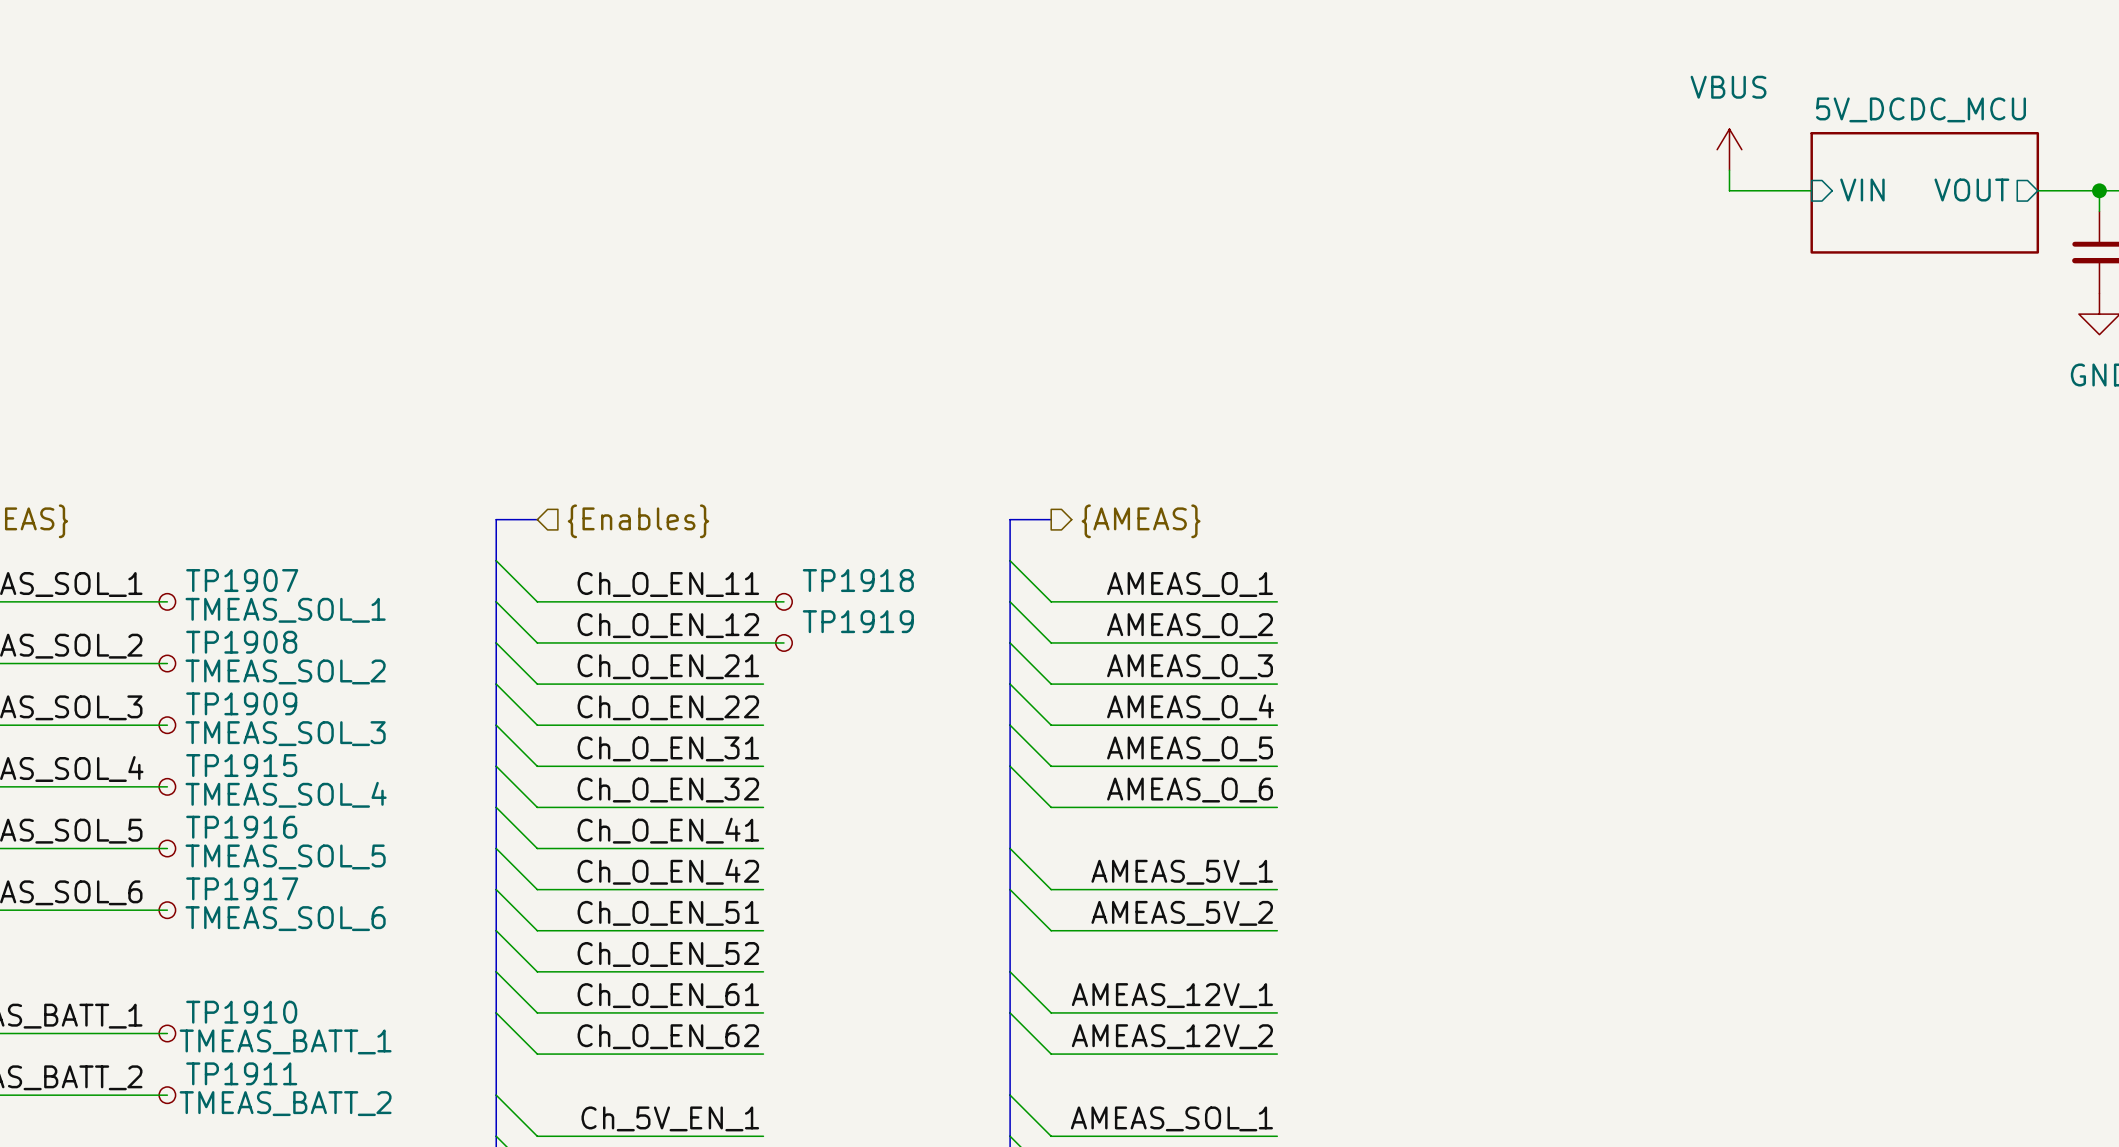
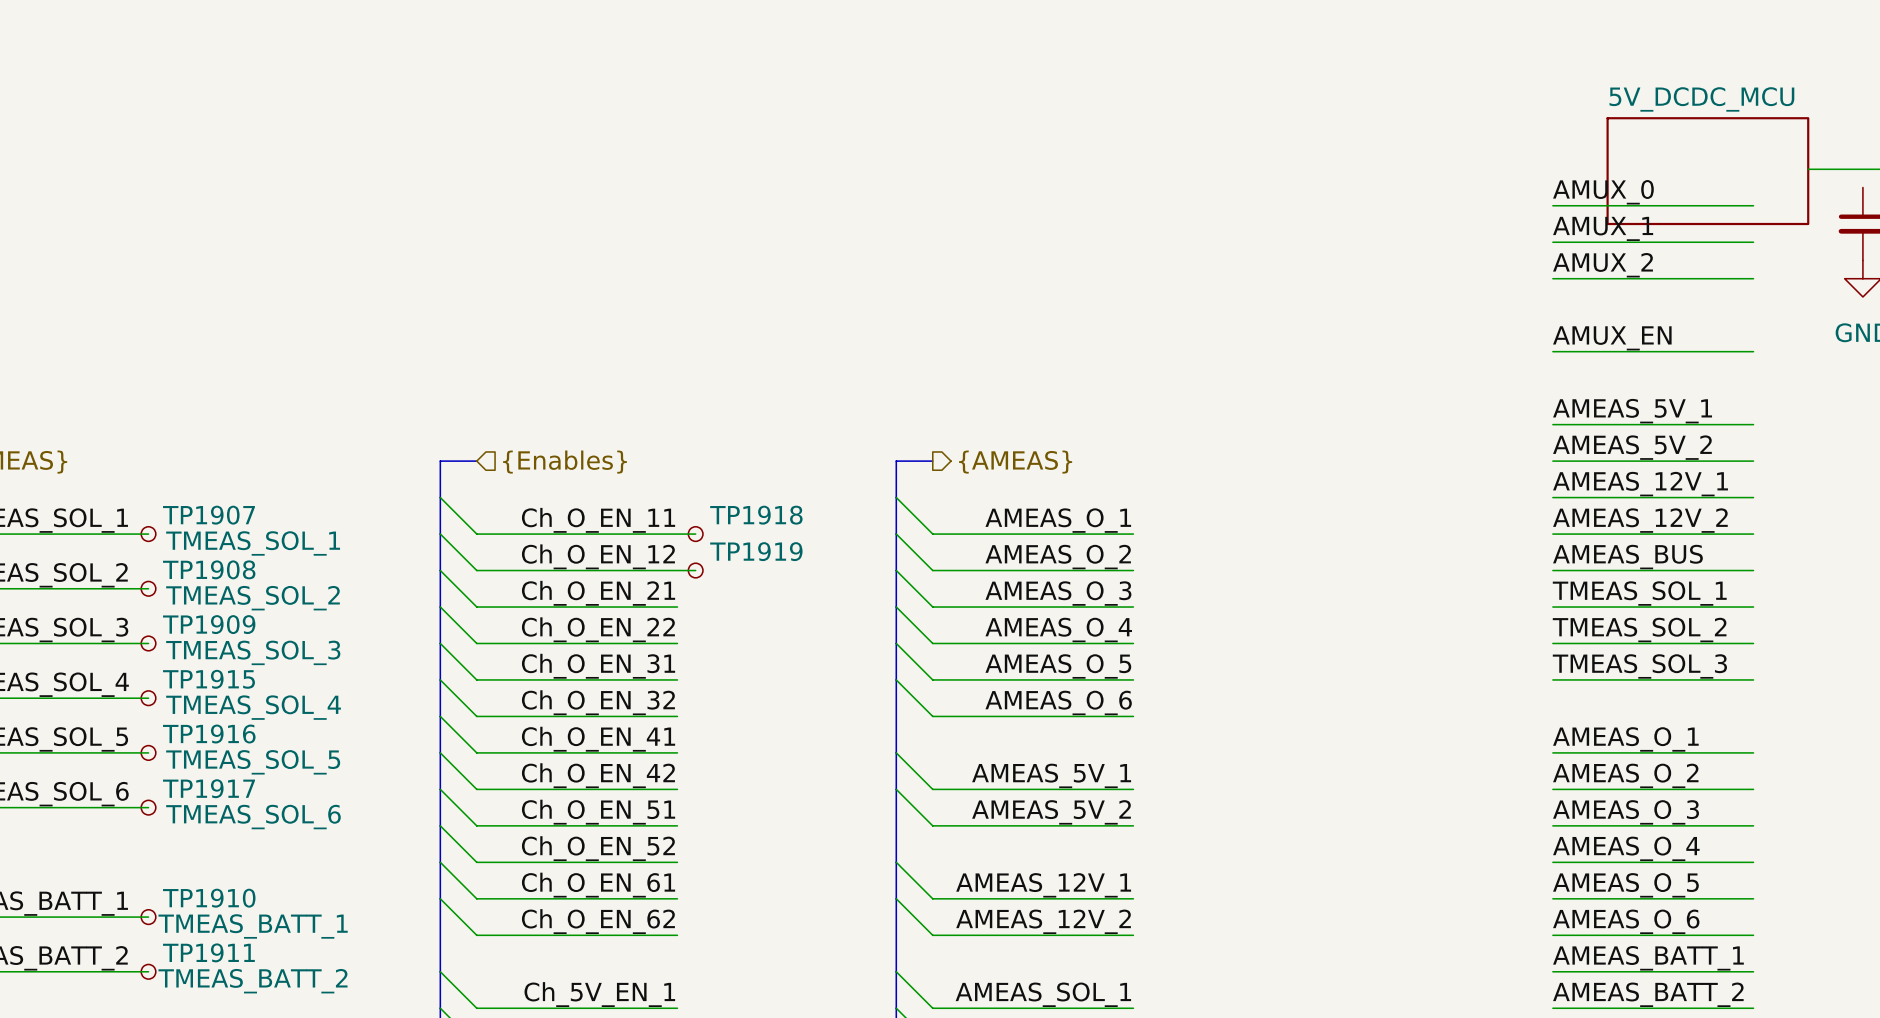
power symbol: VBUS (1729, 149) -> none
wire: (1729, 170) (1729, 190) (1811, 190) -> none
sheet pin: VIN (1862, 190) -> none
sheet pin: VOUT (1971, 190) -> none
wire: (2099, 190) (2099, 211) -> none
junction: (2099, 190) -> none
label: none -> AMUX_0 (1603, 192)
wire: none -> (1552, 205) (1753, 205)
label: none -> AMUX_1 (1603, 228)
wire: none -> (1552, 242) (1753, 242)
label: none -> AMUX_2 (1603, 265)
wire: none -> (1552, 278) (1753, 278)
label: none -> AMUX_EN (1612, 338)
wire: none -> (1552, 351) (1753, 351)
label: none -> AMEAS_5V_1 (1632, 411)
wire: none -> (1552, 424) (1753, 424)
label: none -> AMEAS_5V_2 (1632, 447)
wire: none -> (1552, 461) (1753, 461)
label: none -> AMEAS_12V_1 (1640, 484)
wire: none -> (1552, 497) (1753, 497)
label: none -> AMEAS_12V_2 (1640, 520)
wire: none -> (1552, 534) (1753, 534)
label: none -> AMEAS_BUS (1627, 557)
wire: none -> (1552, 570) (1753, 570)
label: none -> TMEAS_SOL_1 (1639, 593)
wire: none -> (1552, 607) (1753, 607)
label: none -> TMEAS_SOL_2 (1639, 630)
wire: none -> (1552, 643) (1753, 643)
label: none -> TMEAS_SOL_3 (1639, 666)
wire: none -> (1552, 679) (1753, 679)
label: none -> AMEAS_O_1 (1625, 739)
wire: none -> (1552, 752) (1753, 752)
label: none -> AMEAS_O_2 (1625, 775)
wire: none -> (1552, 789) (1753, 789)
label: none -> AMEAS_O_3 (1626, 812)
wire: none -> (1552, 825) (1753, 825)
label: none -> AMEAS_O_4 (1626, 848)
wire: none -> (1552, 862) (1753, 862)
label: none -> AMEAS_O_5 (1625, 885)
wire: none -> (1552, 898) (1753, 898)
label: none -> AMEAS_O_6 (1626, 921)
wire: none -> (1552, 935) (1753, 935)
label: none -> AMEAS_BATT_1 (1648, 958)
wire: none -> (1552, 971) (1753, 971)
label: none -> AMEAS_BATT_2 (1648, 994)
wire: none -> (1552, 1008) (1753, 1008)

